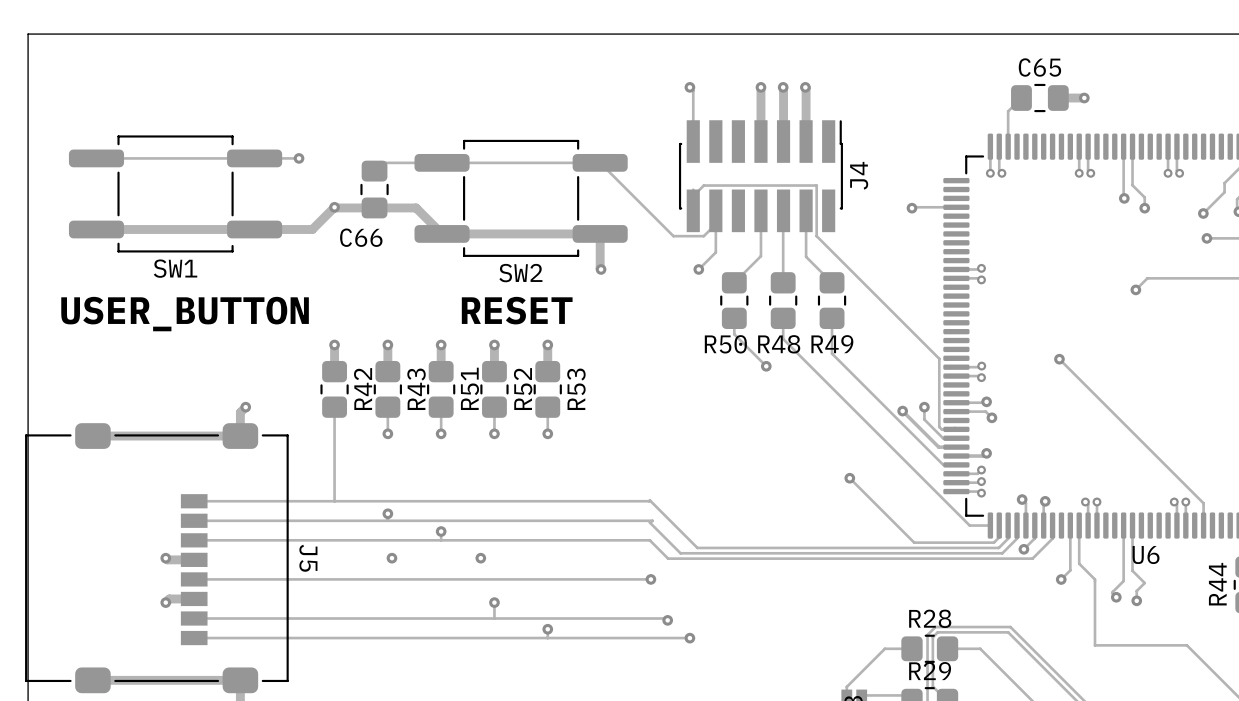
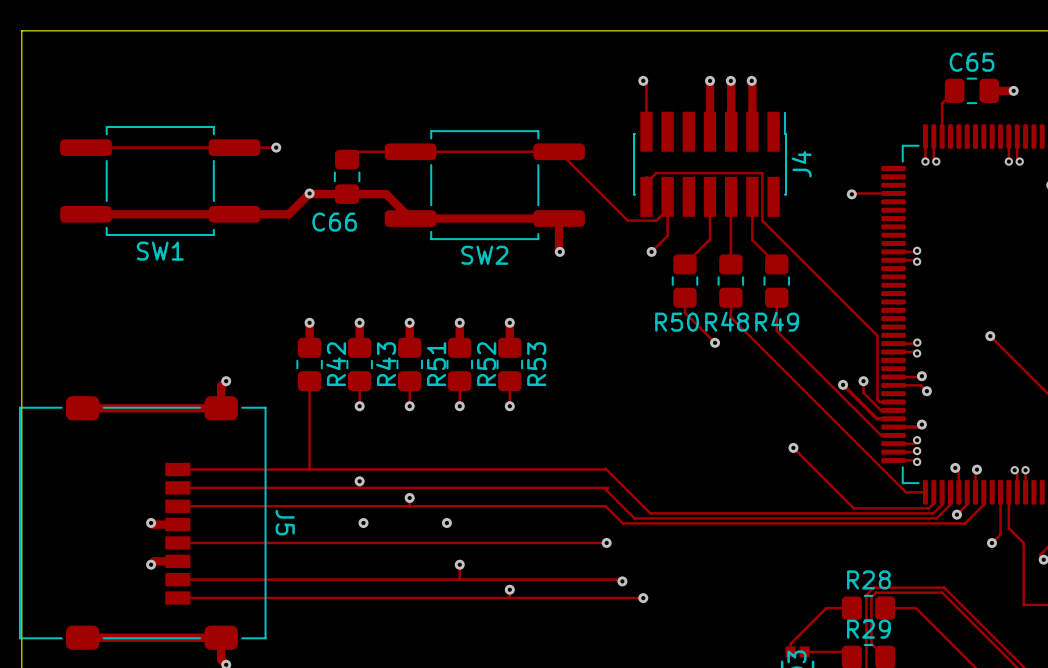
text: RESET (517, 310) -> none
text: USER_BUTTON (185, 314) -> none

